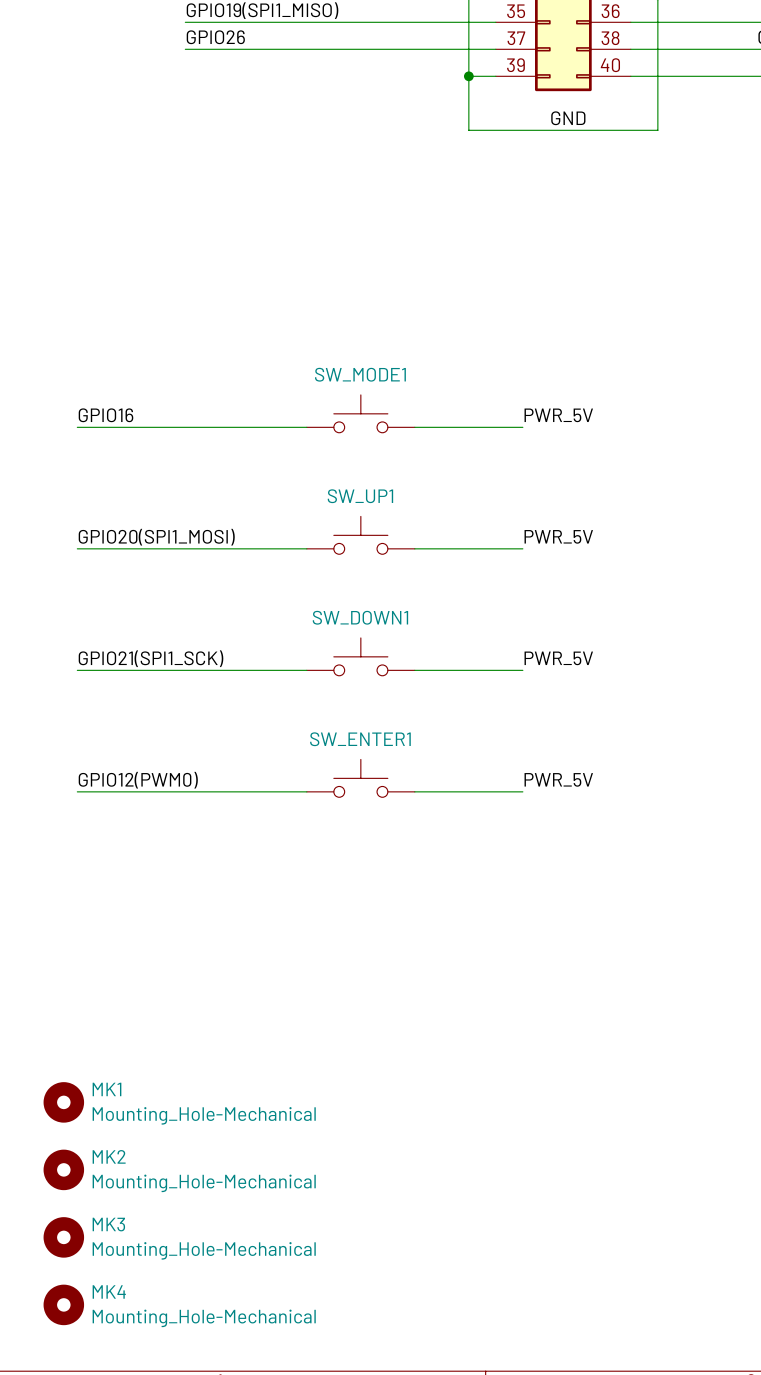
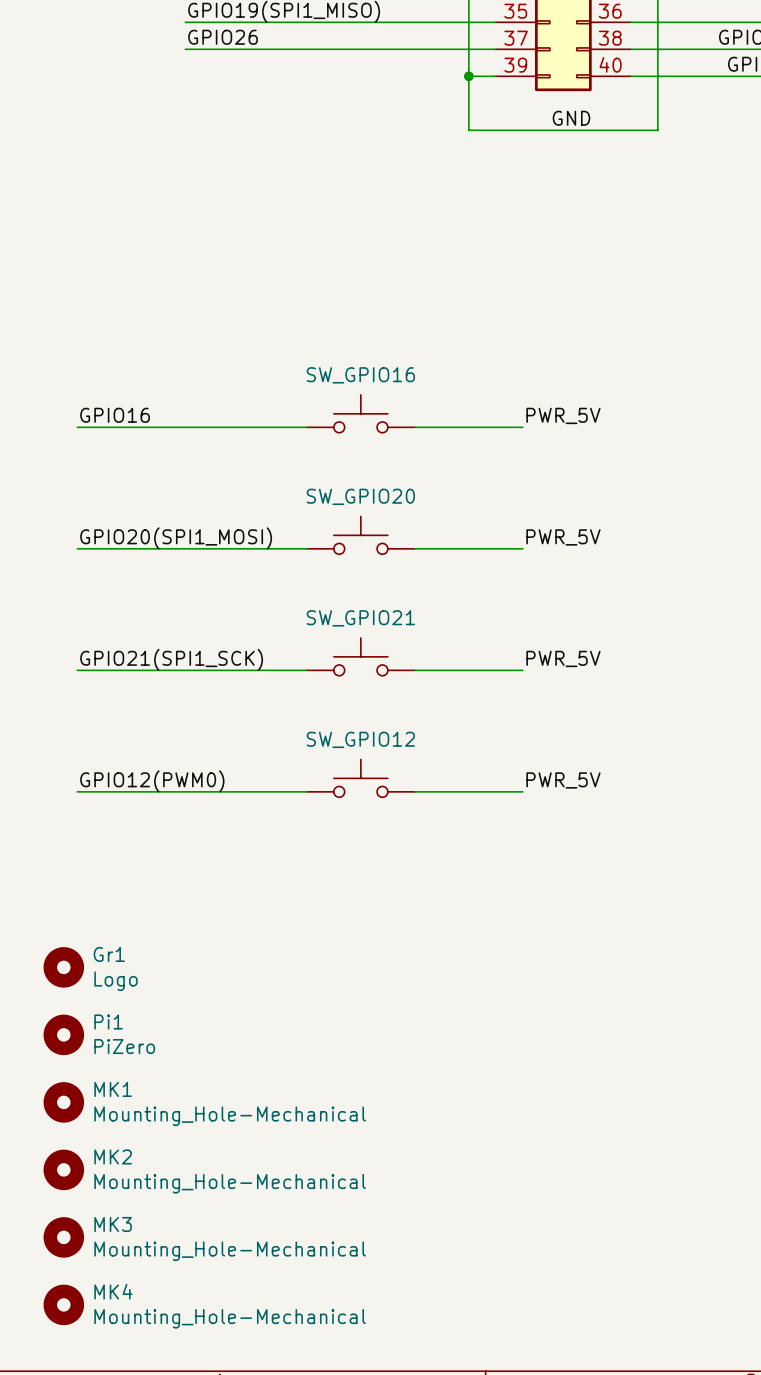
SW_MODE1 name: SW_MODE1 (360, 374) -> SW_GPIO16 (360, 375)
SW_UP1 name: SW_UP1 (360, 496) -> SW_GPIO20 (360, 496)
SW_DOWN1 name: SW_DOWN1 (360, 617) -> SW_GPIO21 (360, 618)
SW_ENTER1 name: SW_ENTER1 (360, 739) -> SW_GPIO12 (360, 739)
Gr1: none -> Logo (63, 967)
Pi1: none -> PiZero (63, 1034)

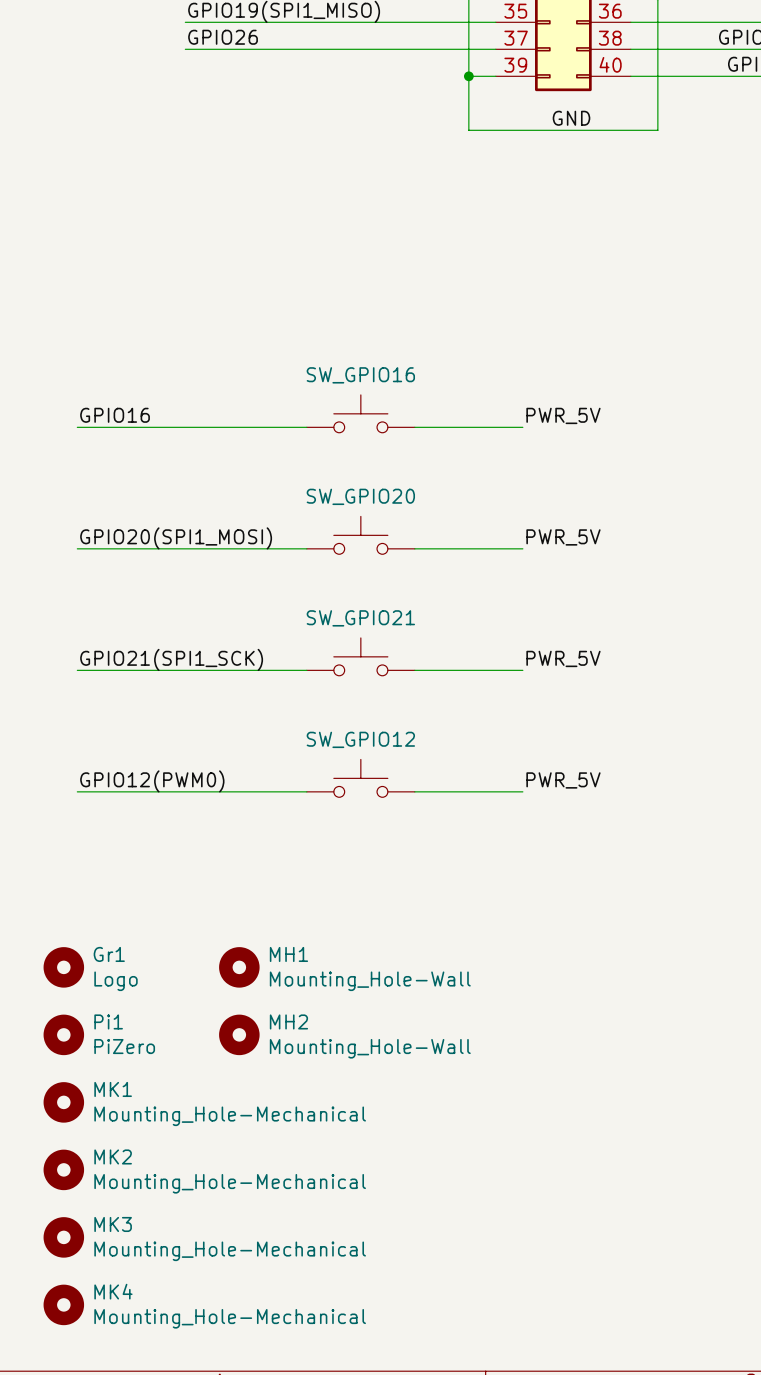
MH1: none -> Mounting_Hole-Wall (239, 967)
MH2: none -> Mounting_Hole-Wall (239, 1034)

